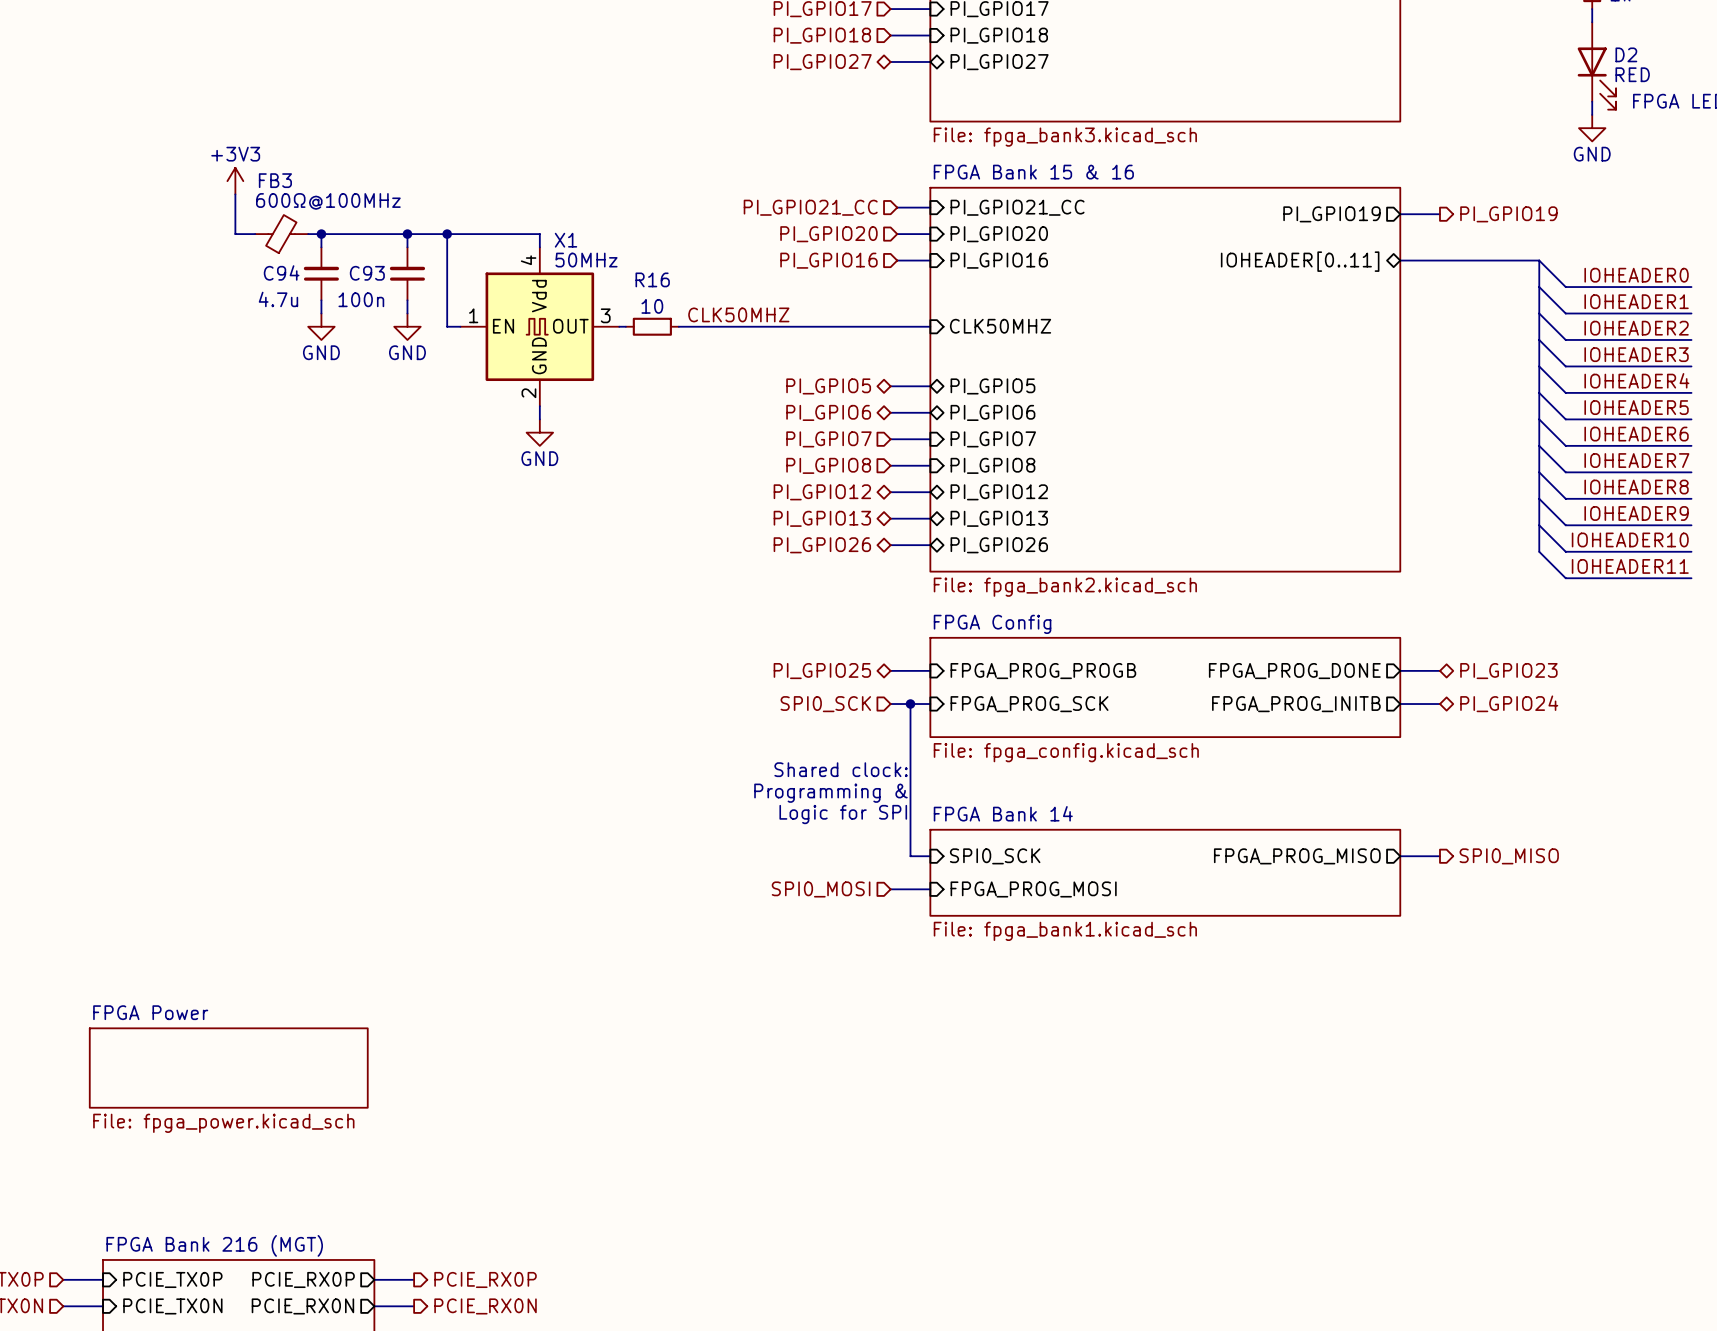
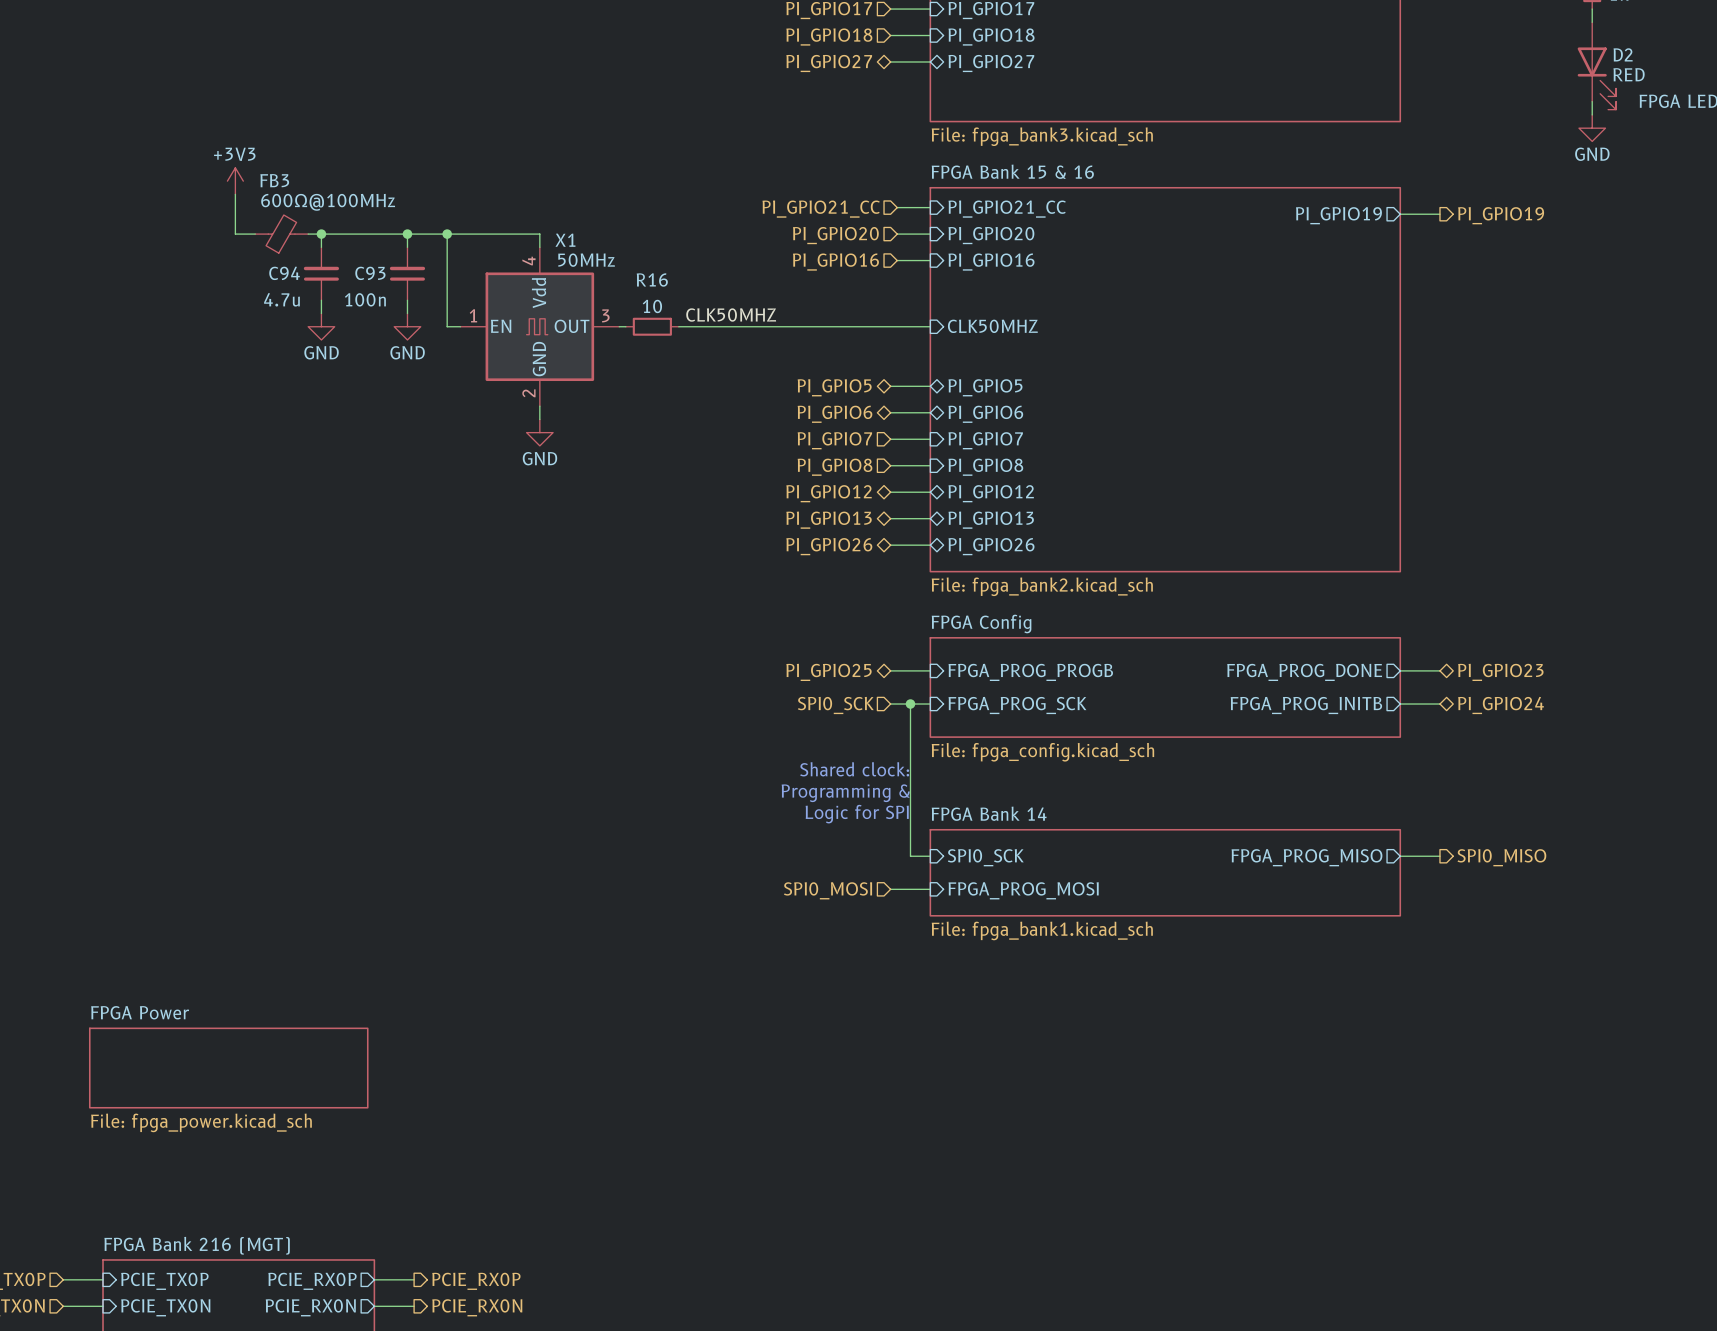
bus: (1400, 260) (1539, 260) (1539, 551) -> none
wire: (1539, 260) (1565, 287) (1691, 287) -> none
sheet pin: IOHEADER[0..11] (1300, 261) -> none
label: IOHEADER0 (1636, 275) -> none
wire: (1539, 287) (1565, 313) (1691, 313) -> none
label: IOHEADER1 (1636, 301) -> none
wire: (1539, 313) (1565, 339) (1691, 339) -> none
label: IOHEADER2 (1636, 328) -> none
wire: (1539, 339) (1565, 366) (1691, 366) -> none
label: IOHEADER3 (1636, 354) -> none
wire: (1539, 366) (1565, 392) (1691, 392) -> none
label: IOHEADER4 (1636, 380) -> none
wire: (1539, 392) (1565, 419) (1691, 419) -> none
label: IOHEADER5 (1636, 407) -> none
wire: (1539, 419) (1565, 445) (1691, 445) -> none
label: IOHEADER6 (1636, 434) -> none
wire: (1539, 445) (1565, 472) (1691, 472) -> none
label: IOHEADER7 (1636, 460) -> none
wire: (1539, 472) (1565, 498) (1691, 498) -> none
label: IOHEADER8 (1636, 487) -> none
wire: (1539, 498) (1565, 525) (1691, 525) -> none
label: IOHEADER9 (1636, 513) -> none
wire: (1539, 525) (1565, 551) (1691, 551) -> none
label: IOHEADER10 (1630, 539) -> none
wire: (1539, 551) (1565, 578) (1691, 578) -> none
label: IOHEADER11 (1630, 566) -> none

